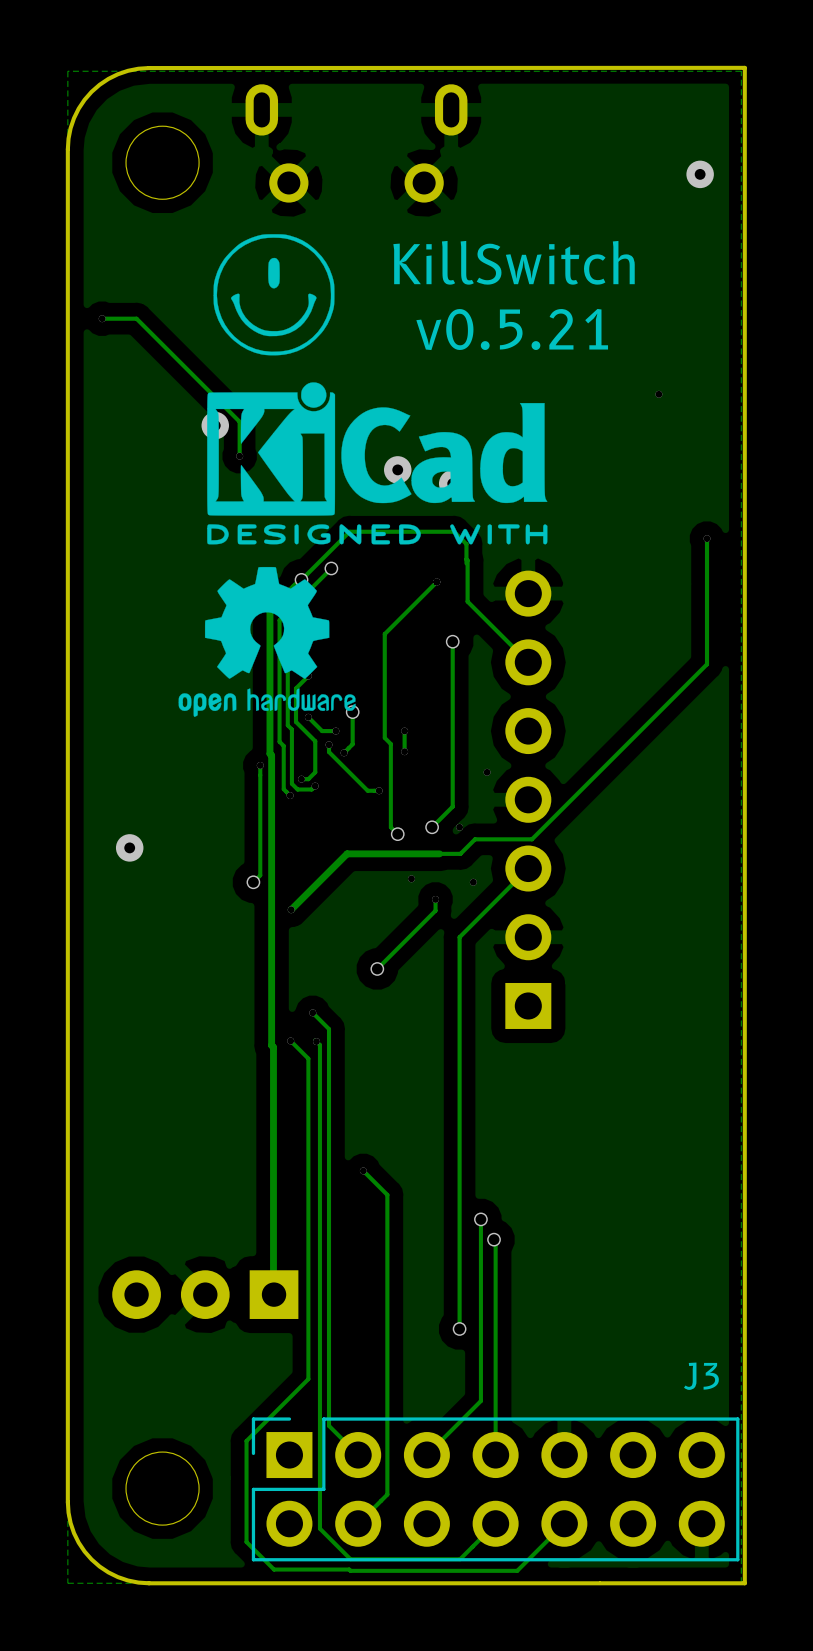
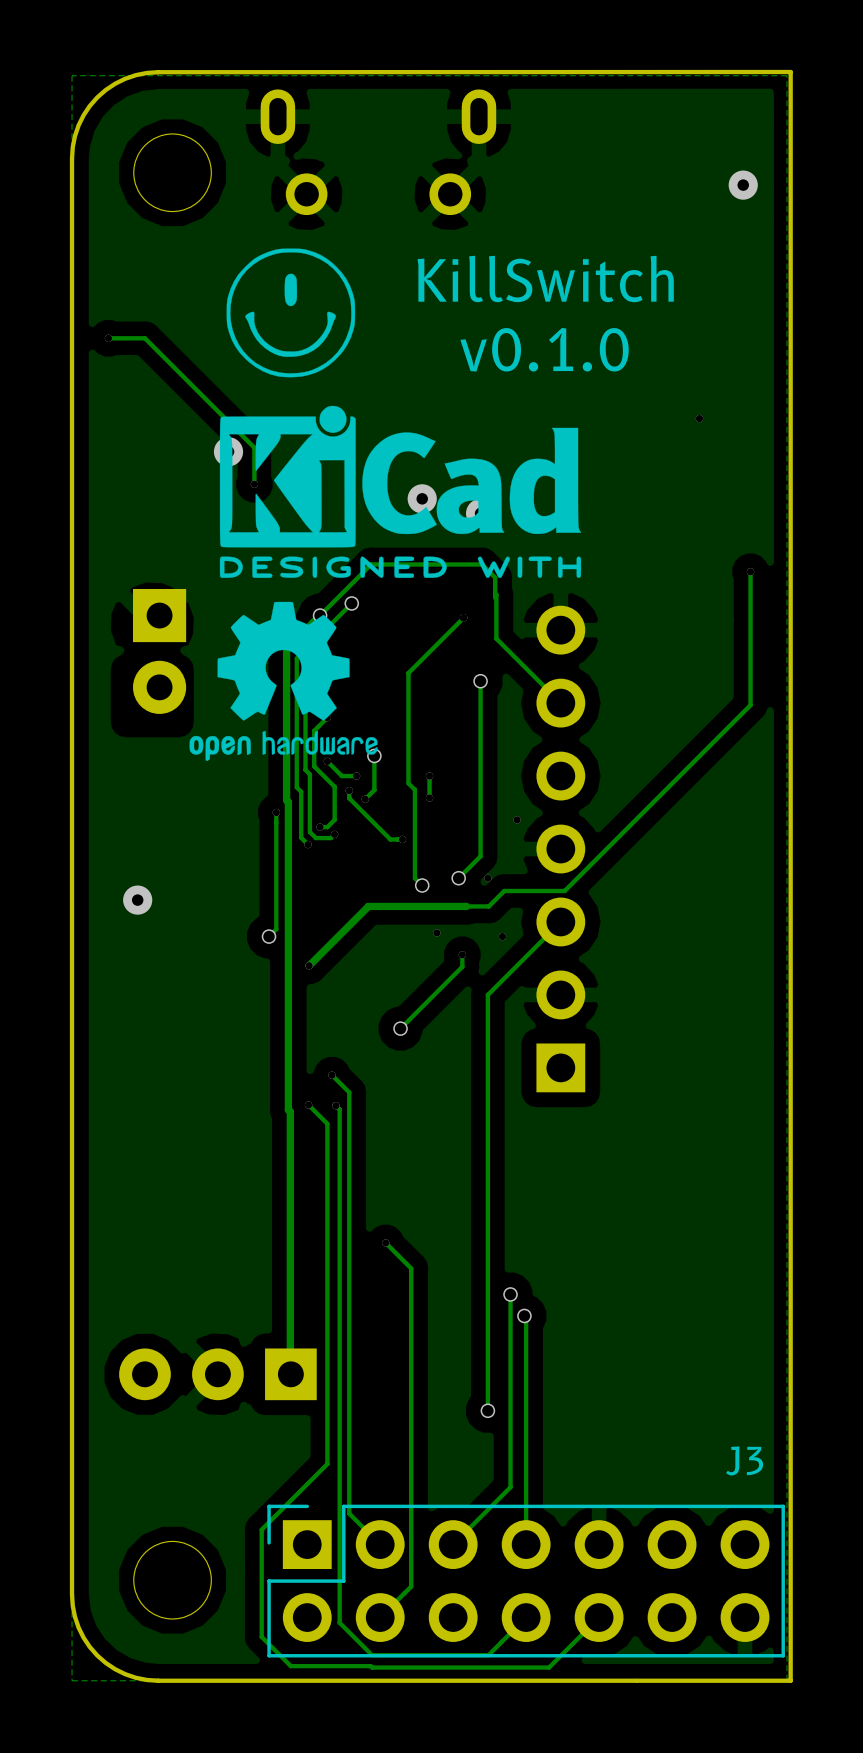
text: v0.5.21 (512, 329) -> v0.1.0 (544, 349)
part: none -> (159, 651)

